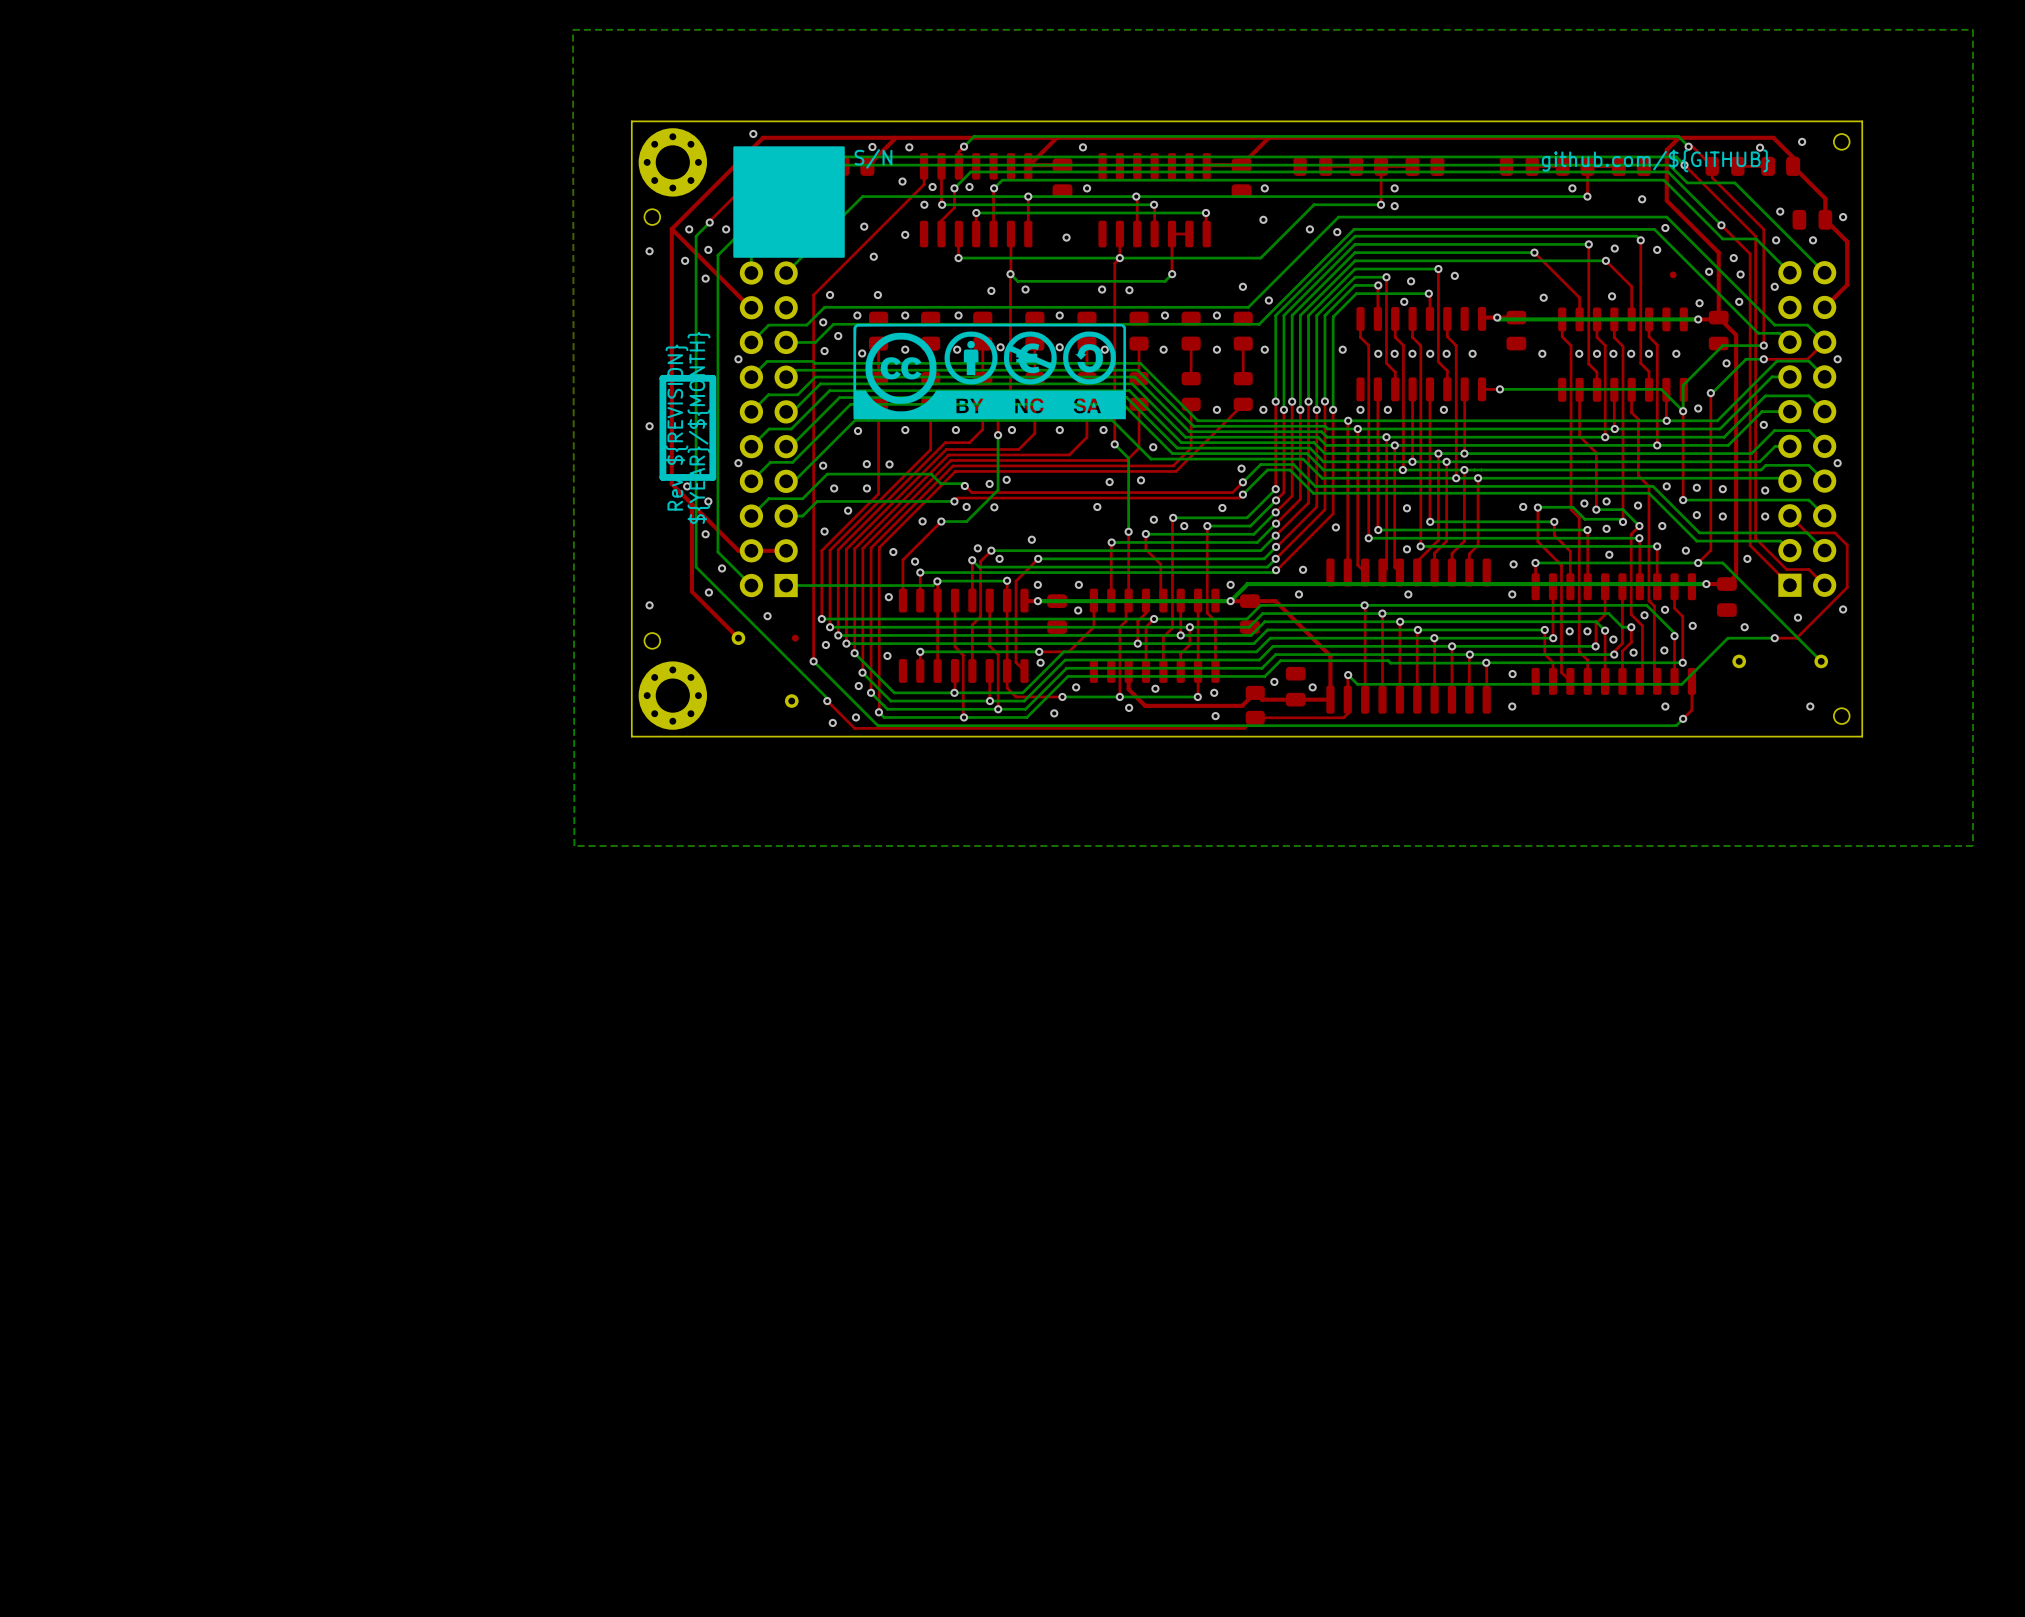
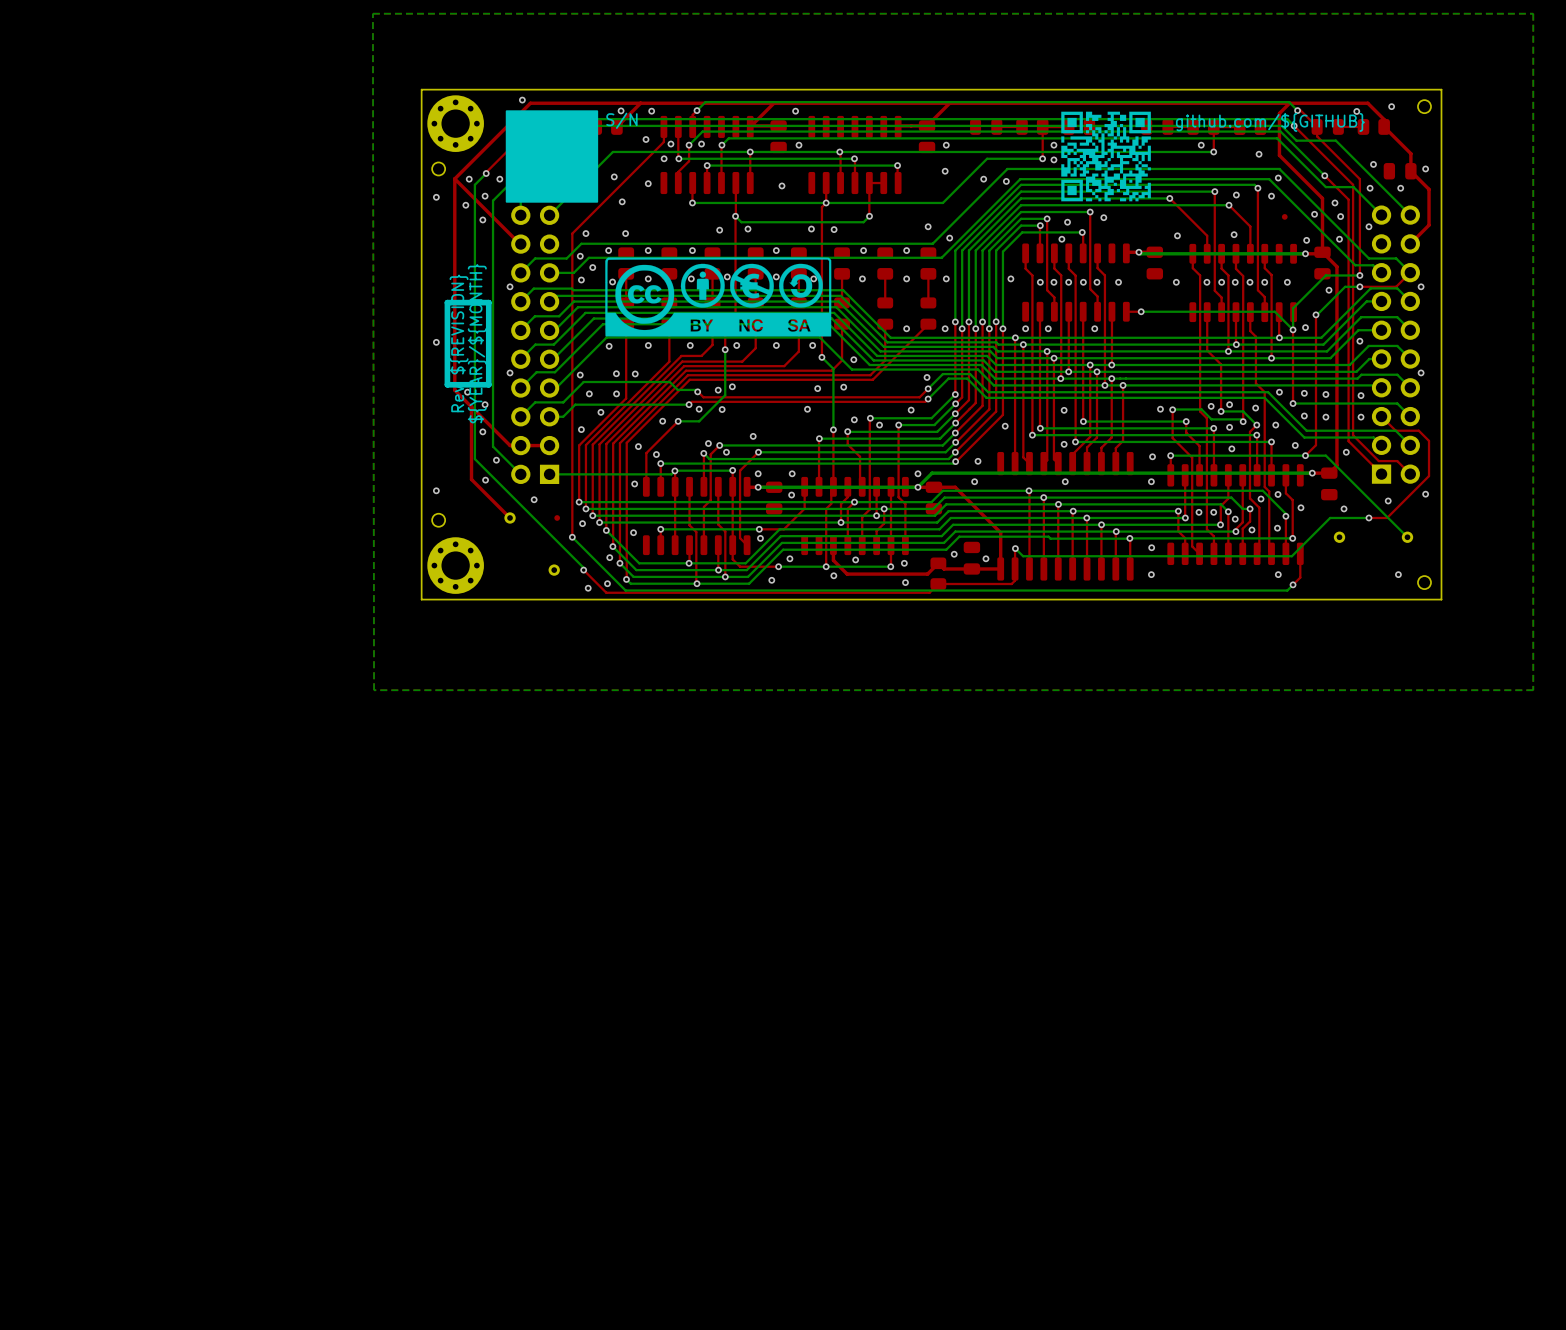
drawing: none -> [1061, 111, 1151, 202]

